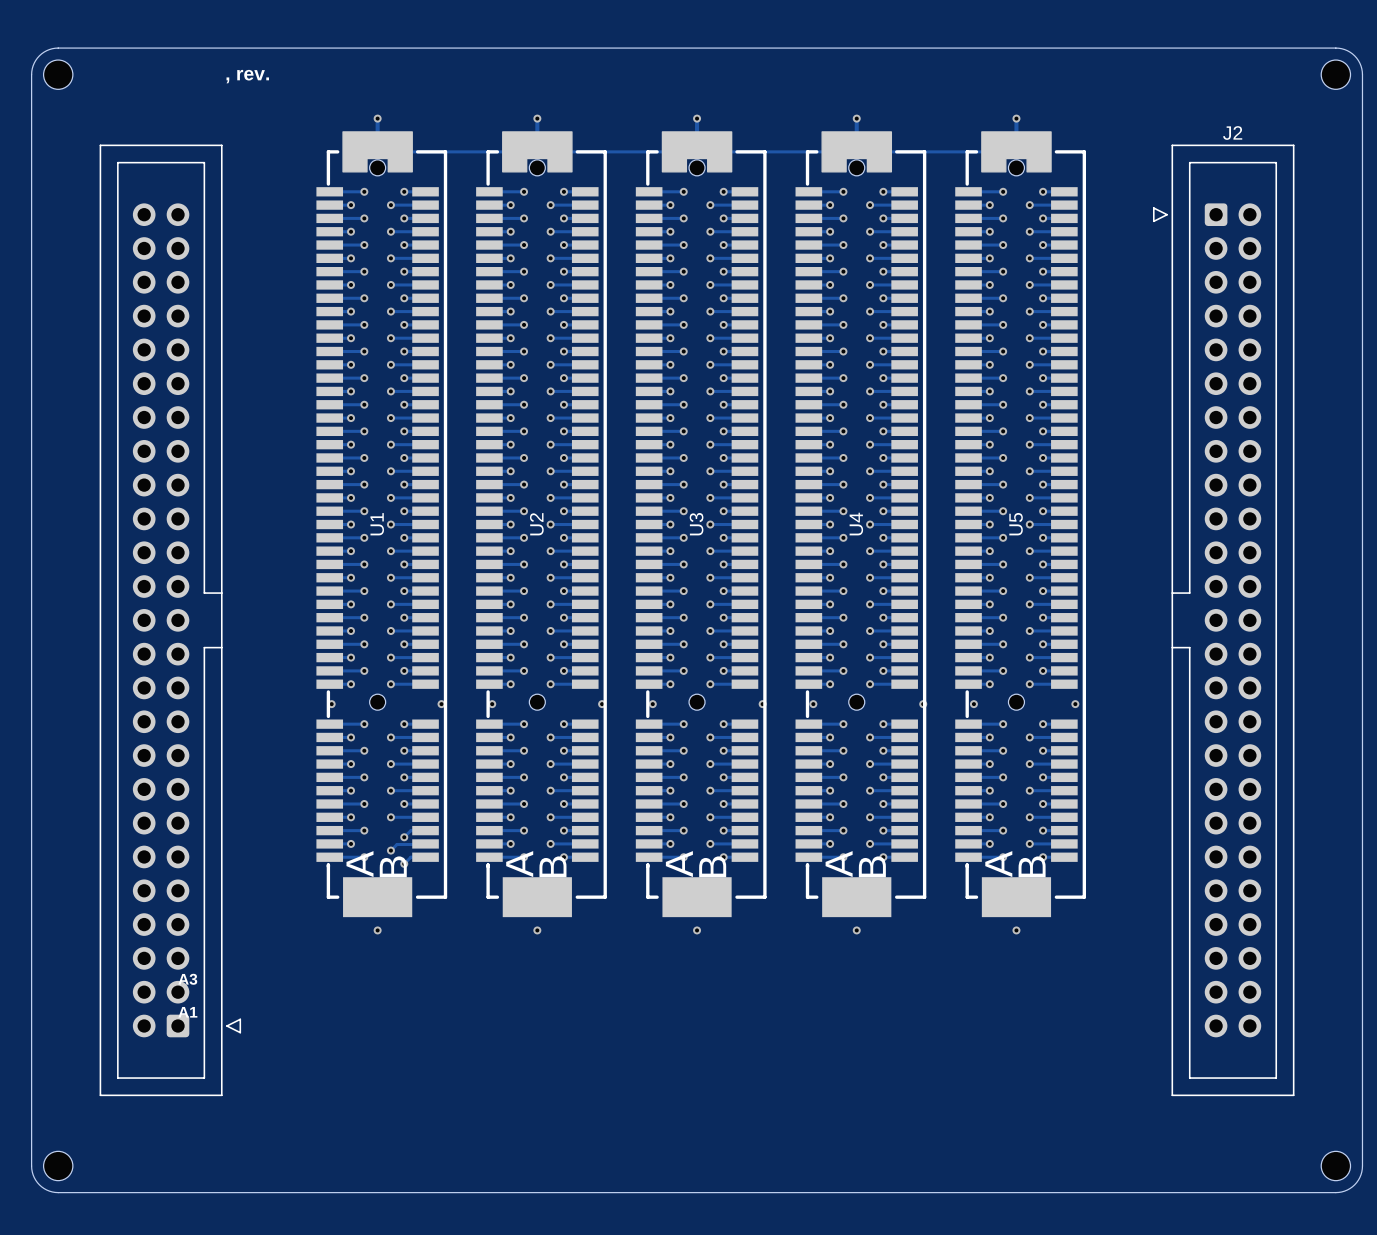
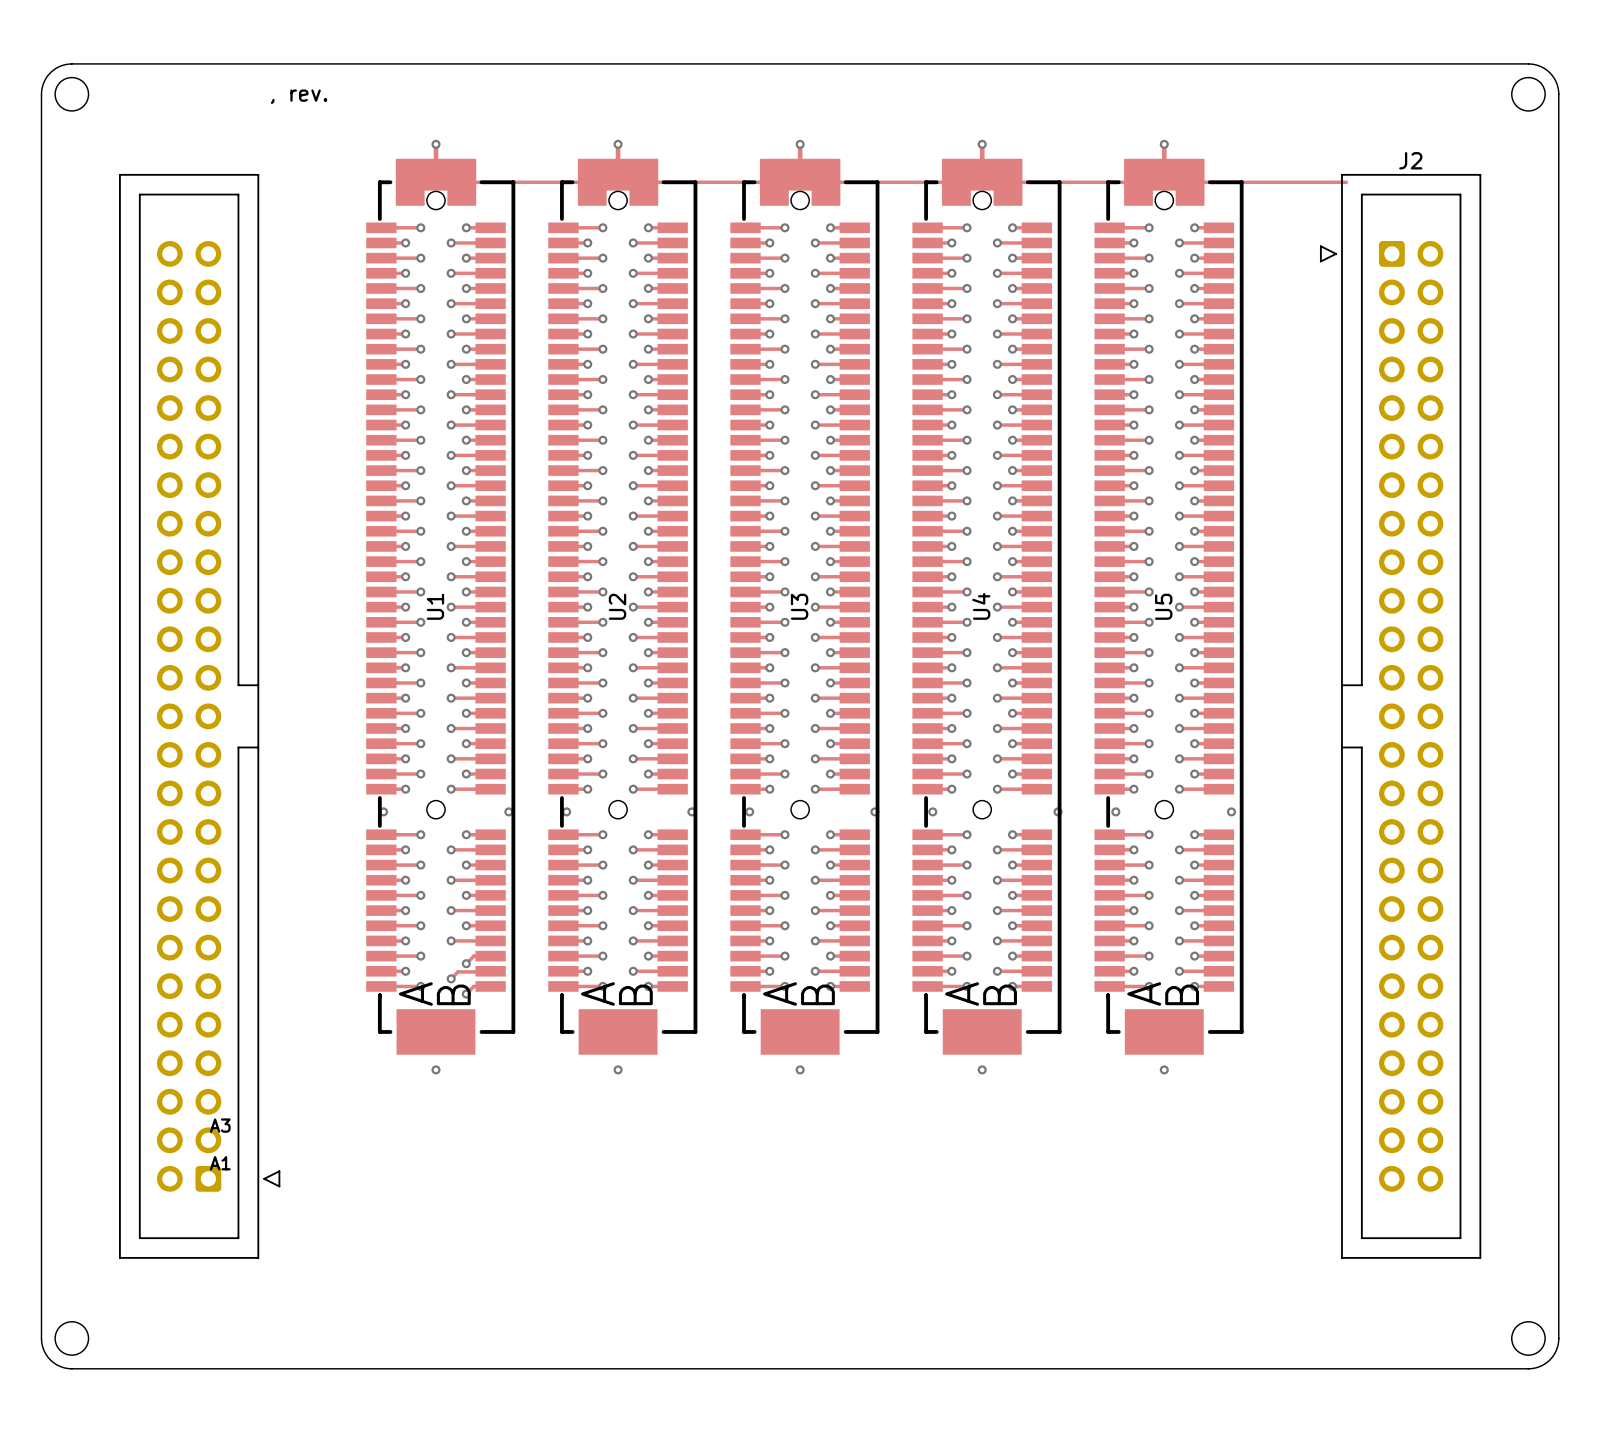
track: none -> (1164, 182) (1346, 182)

